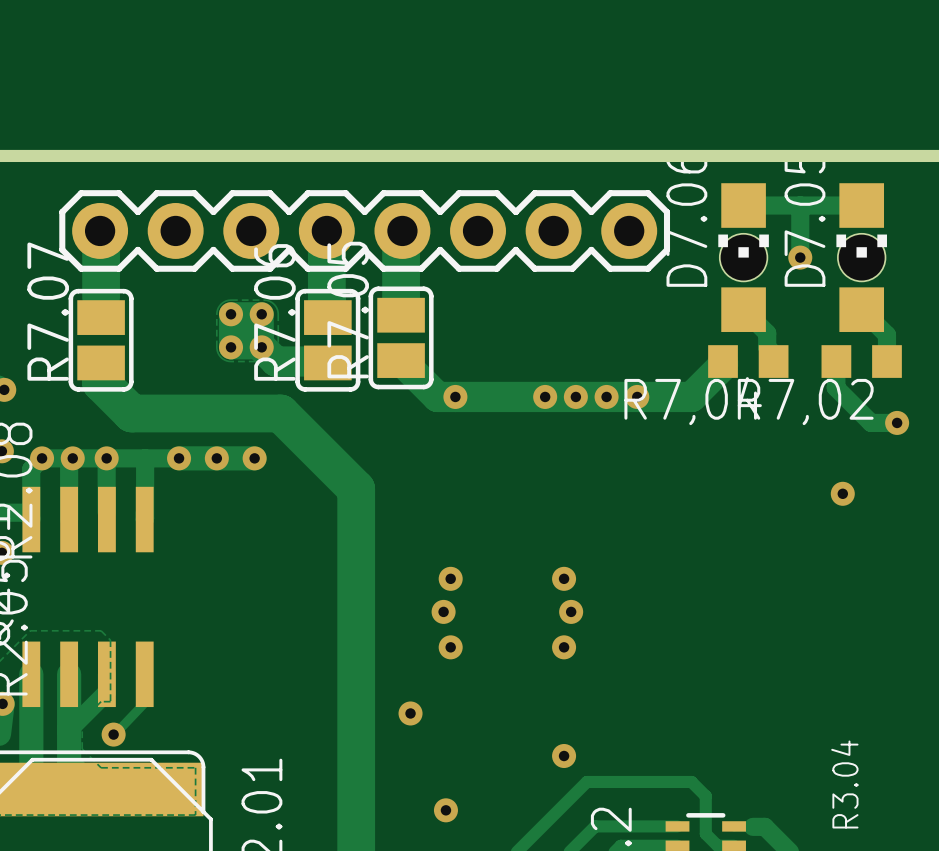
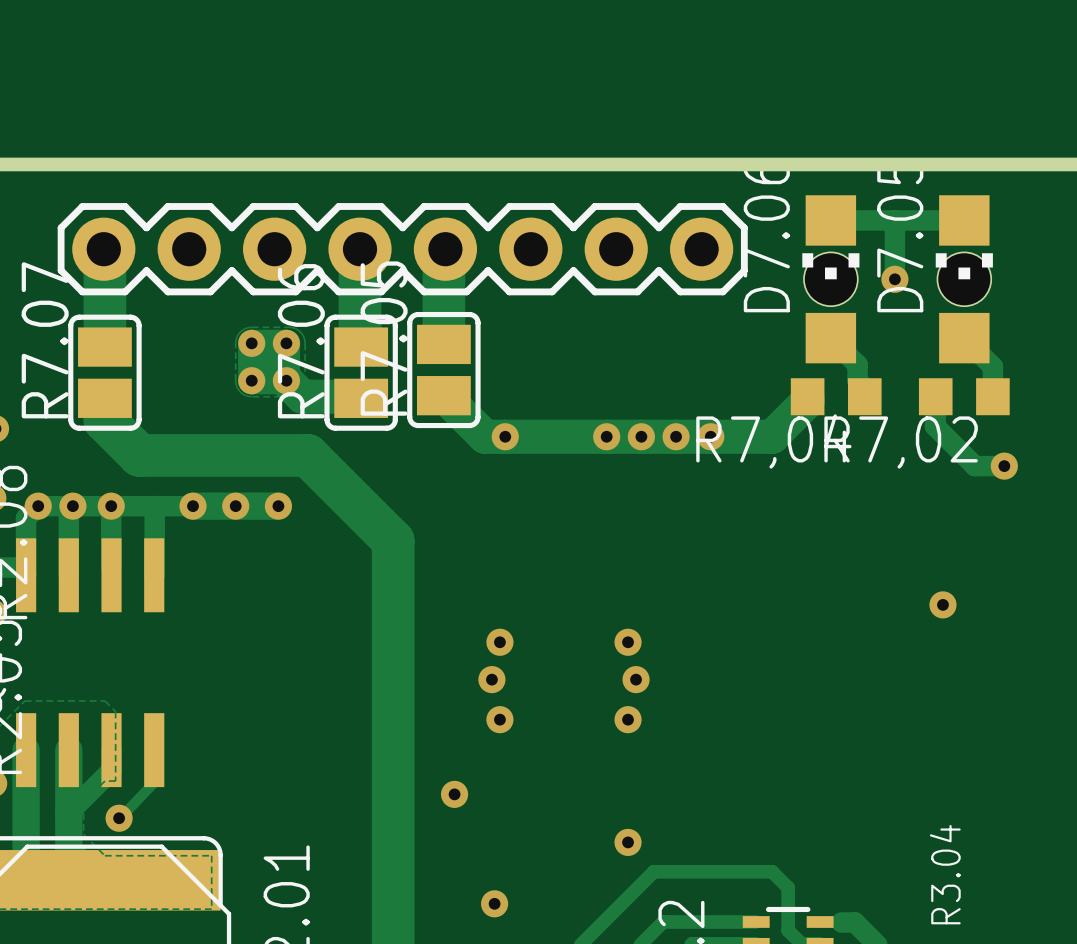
via position: (842, 493) -> (942, 604)

